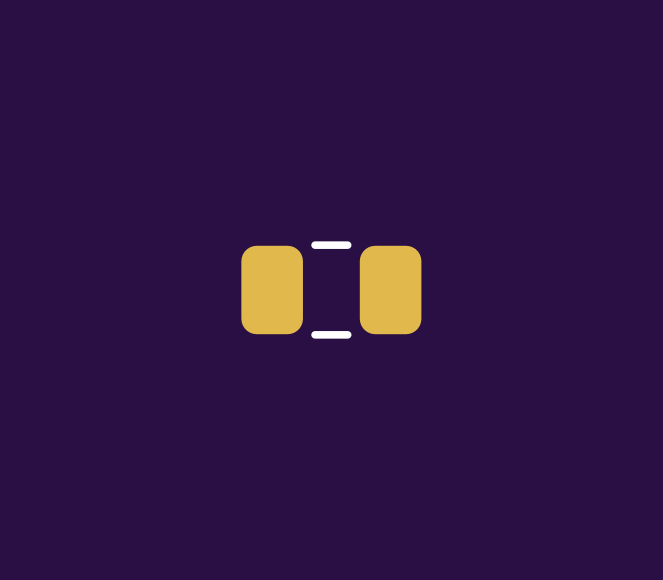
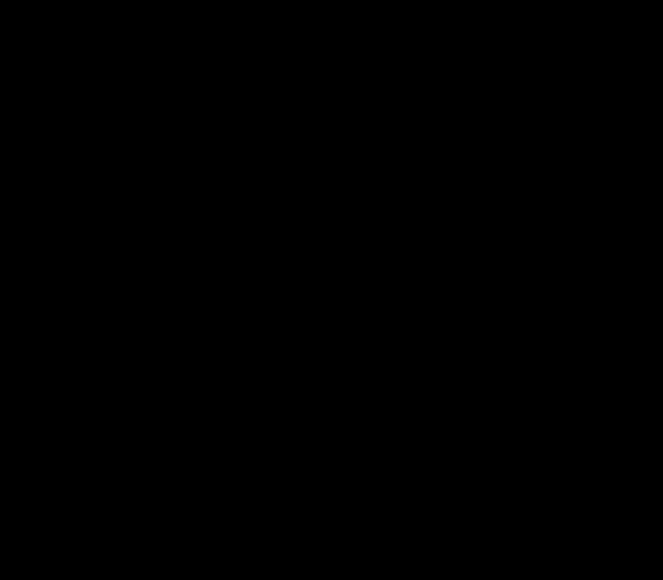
part: (331, 289) -> none

